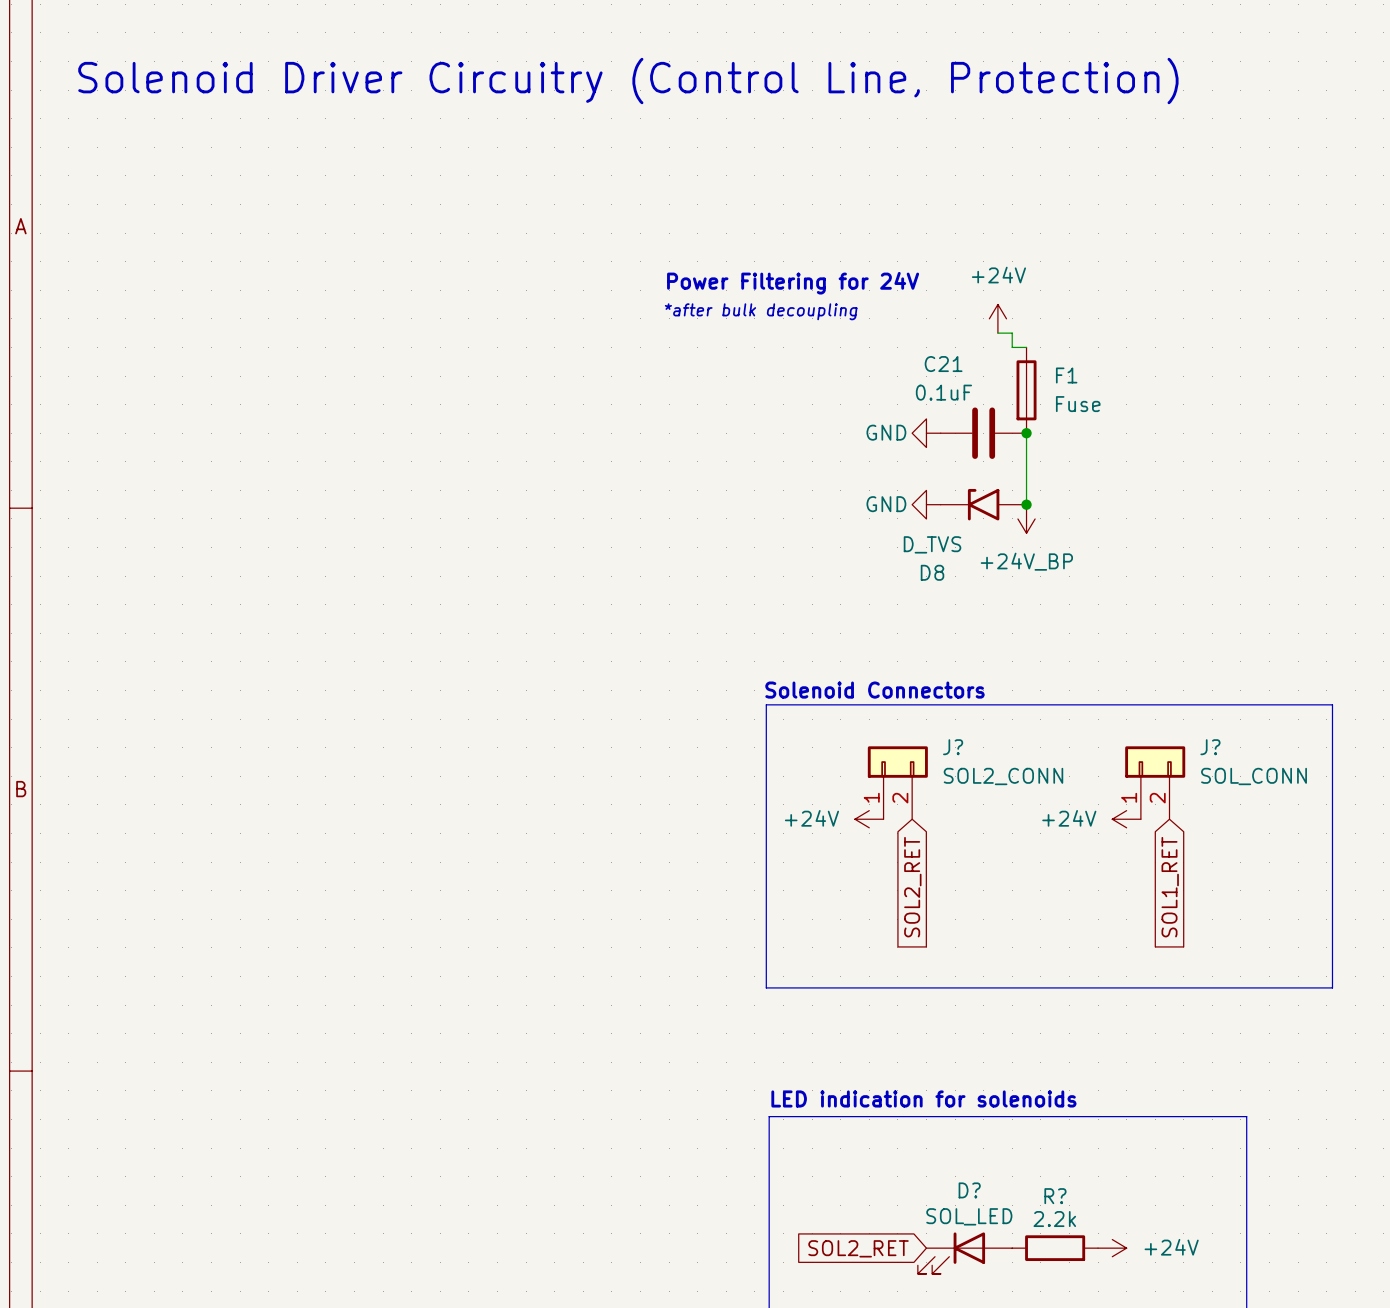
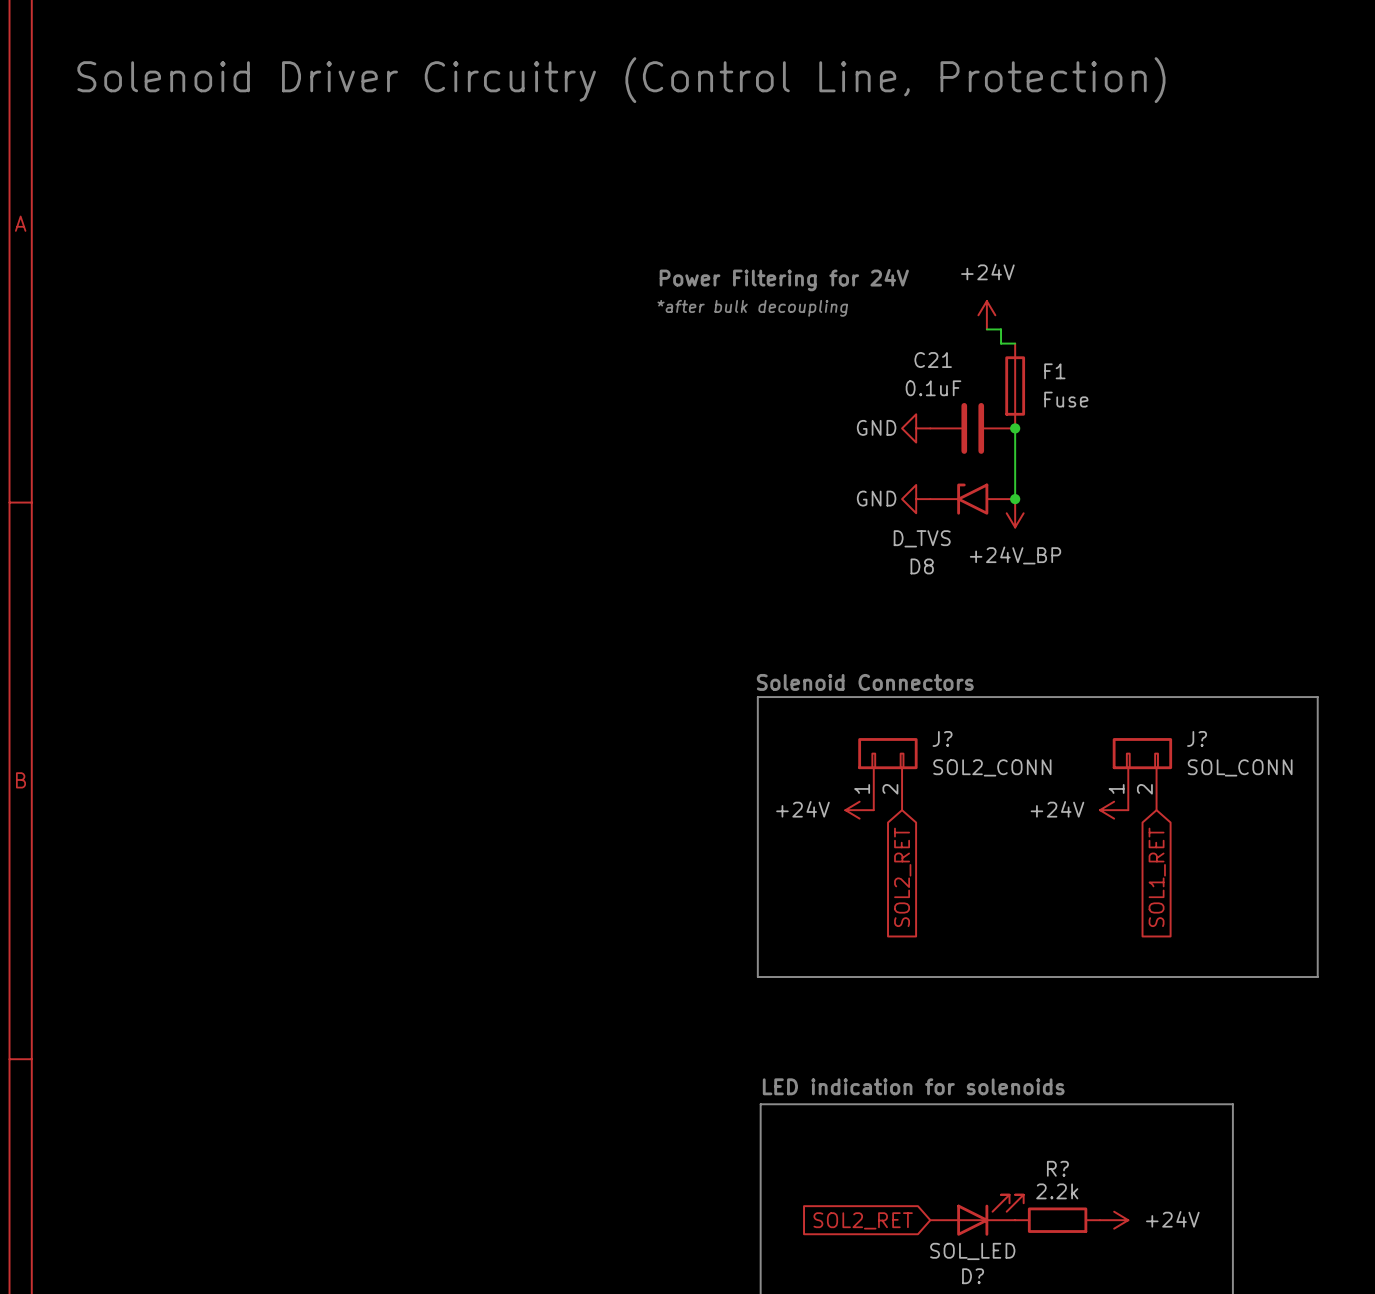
global label position: SOL2_RET (858, 1248) -> SOL2_RET (863, 1220)
R? position: (1055, 1248) -> (1057, 1220)
power symbol position: +24V (1112, 1248) -> +24V (1114, 1220)
D? rotation: 0° (951, 1253) -> 180° (990, 1215)

